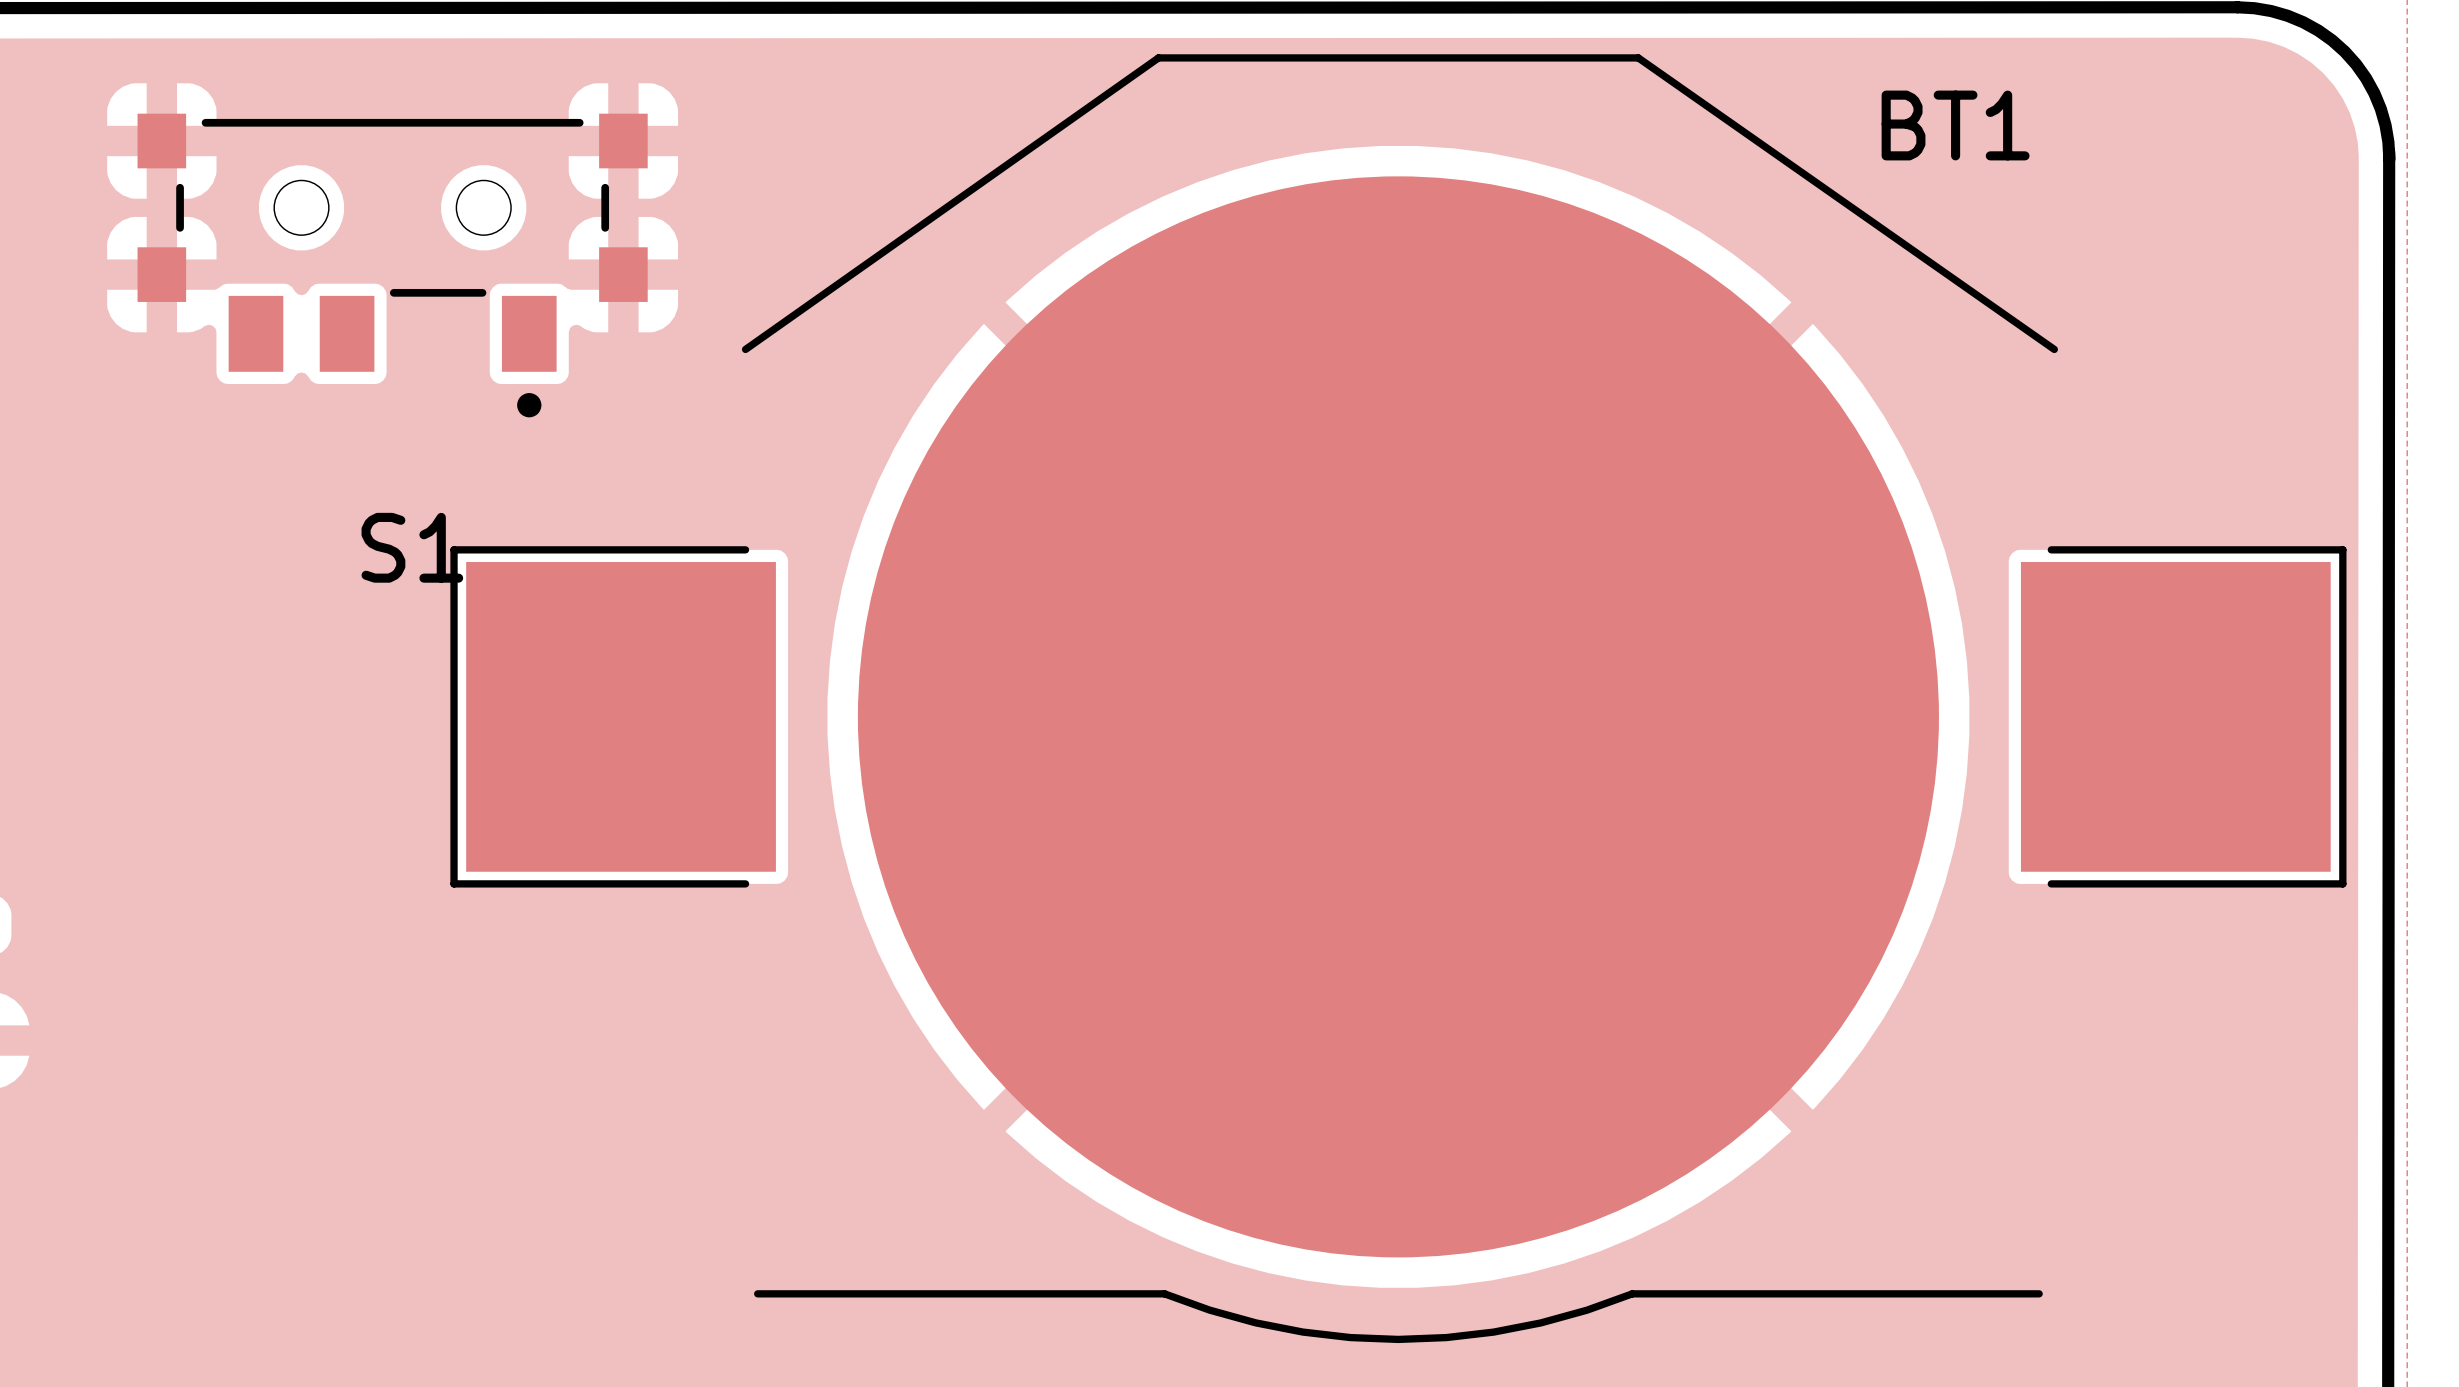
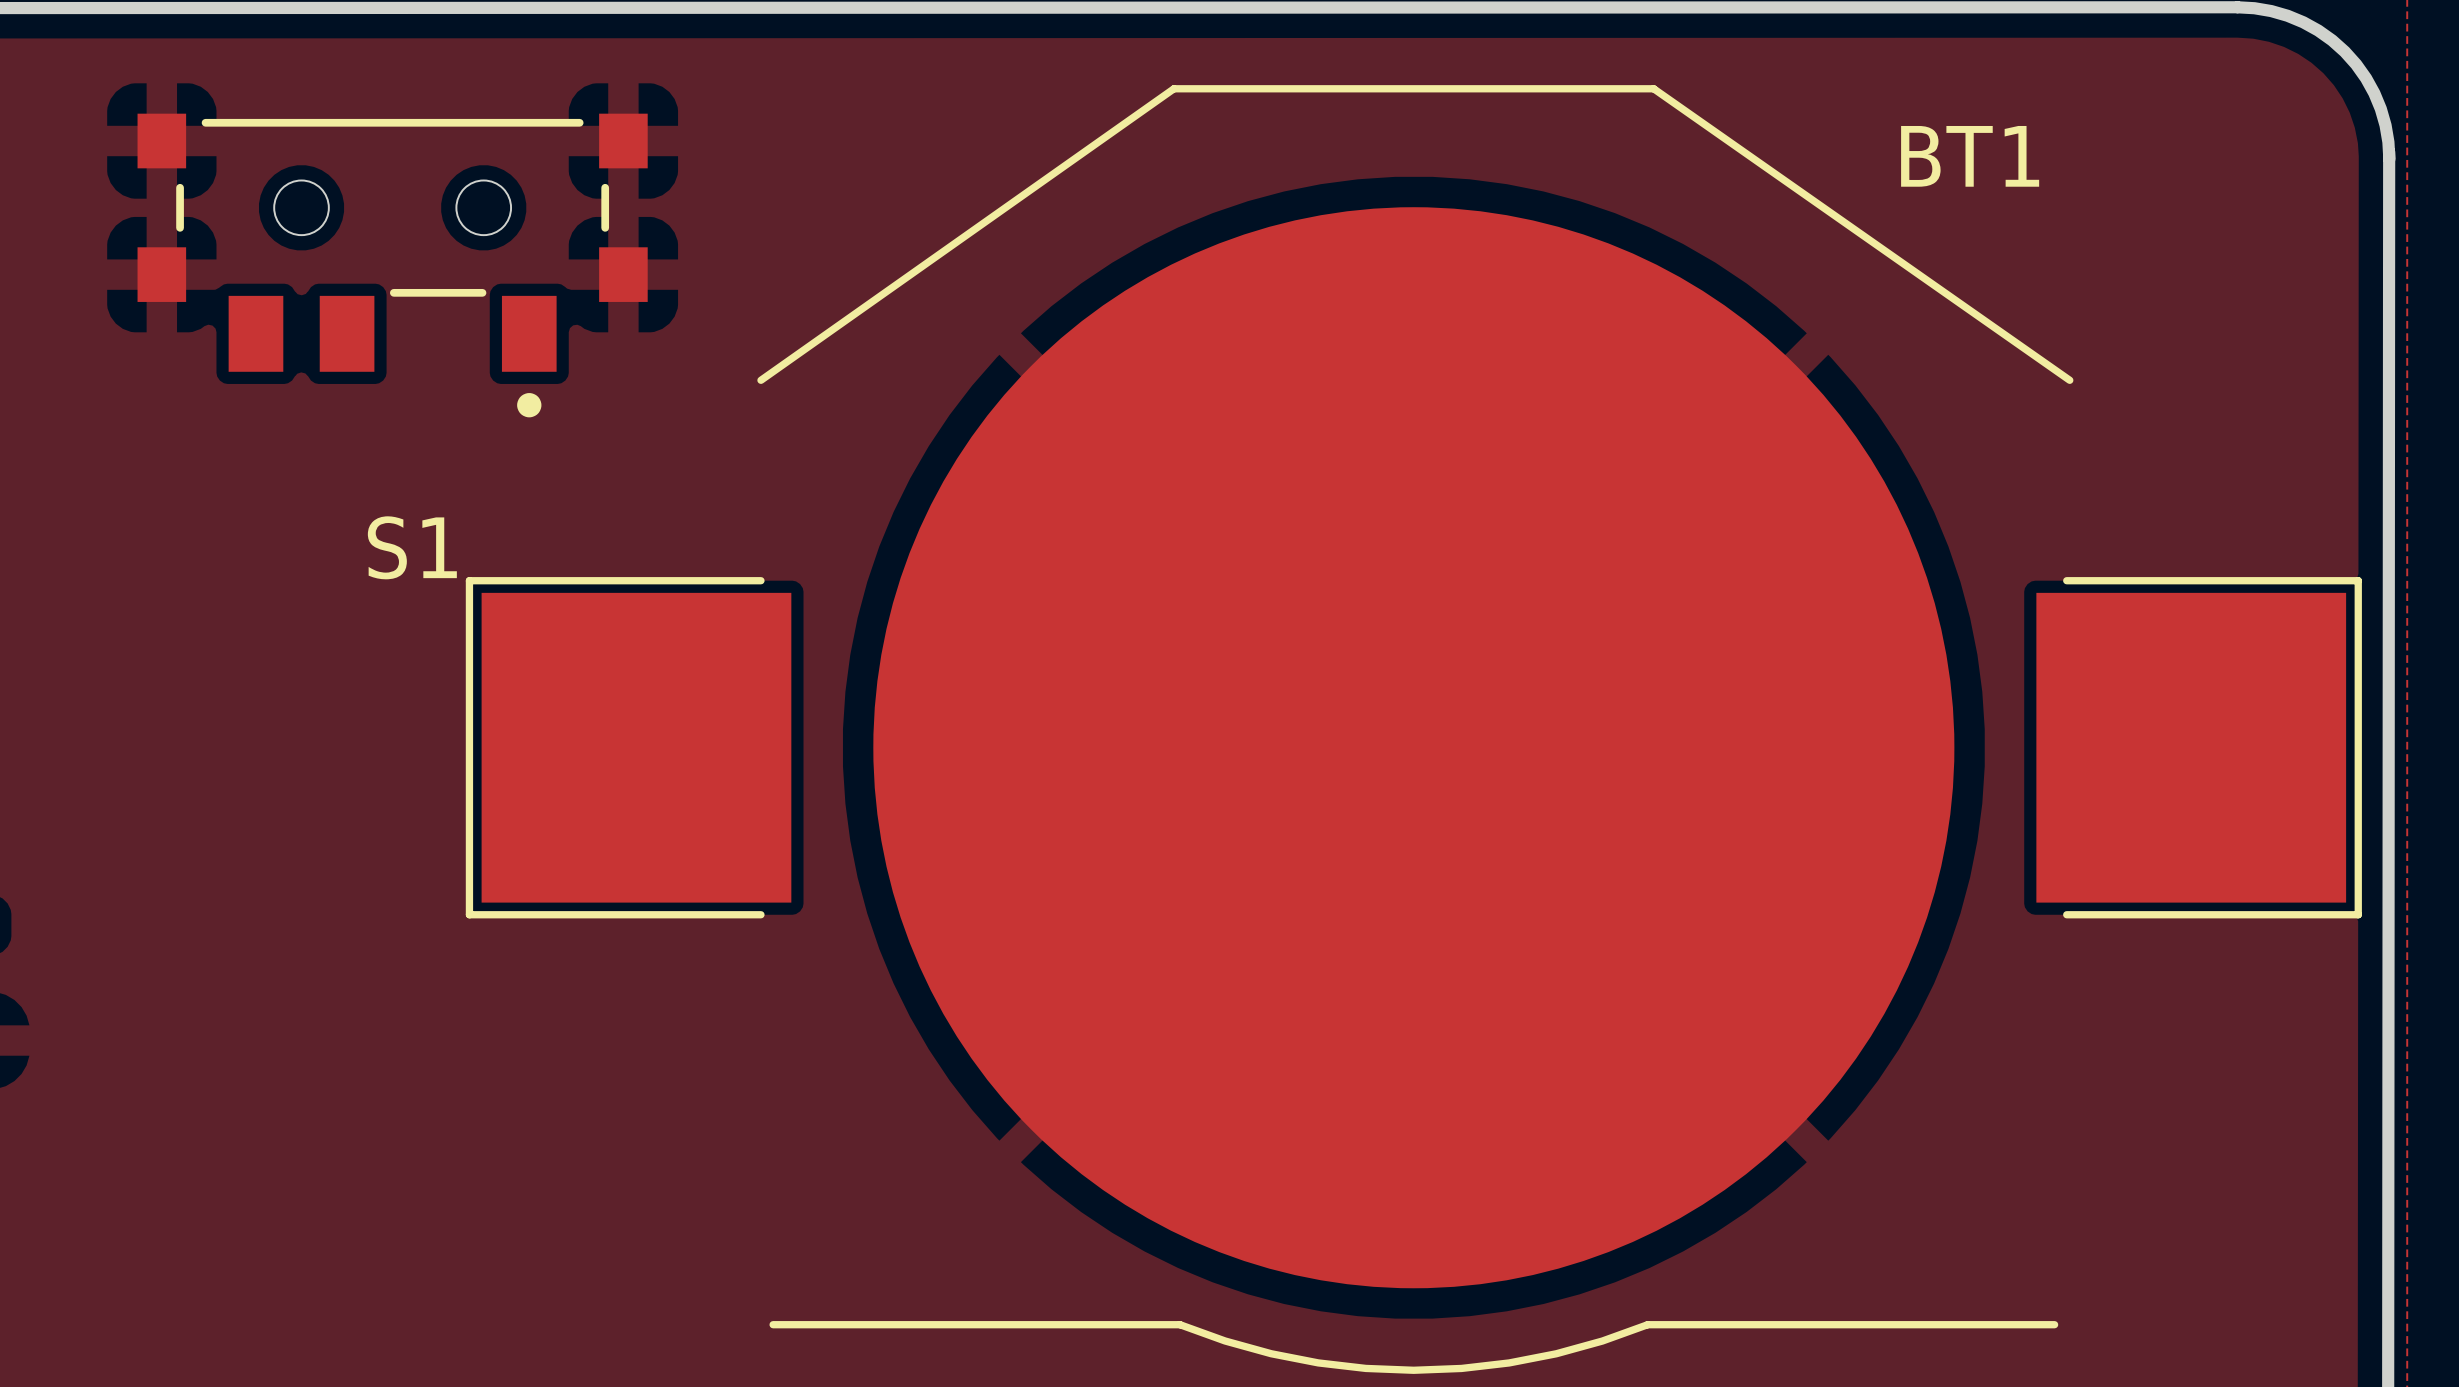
BT1 position: (1398, 698) -> (1413, 729)

